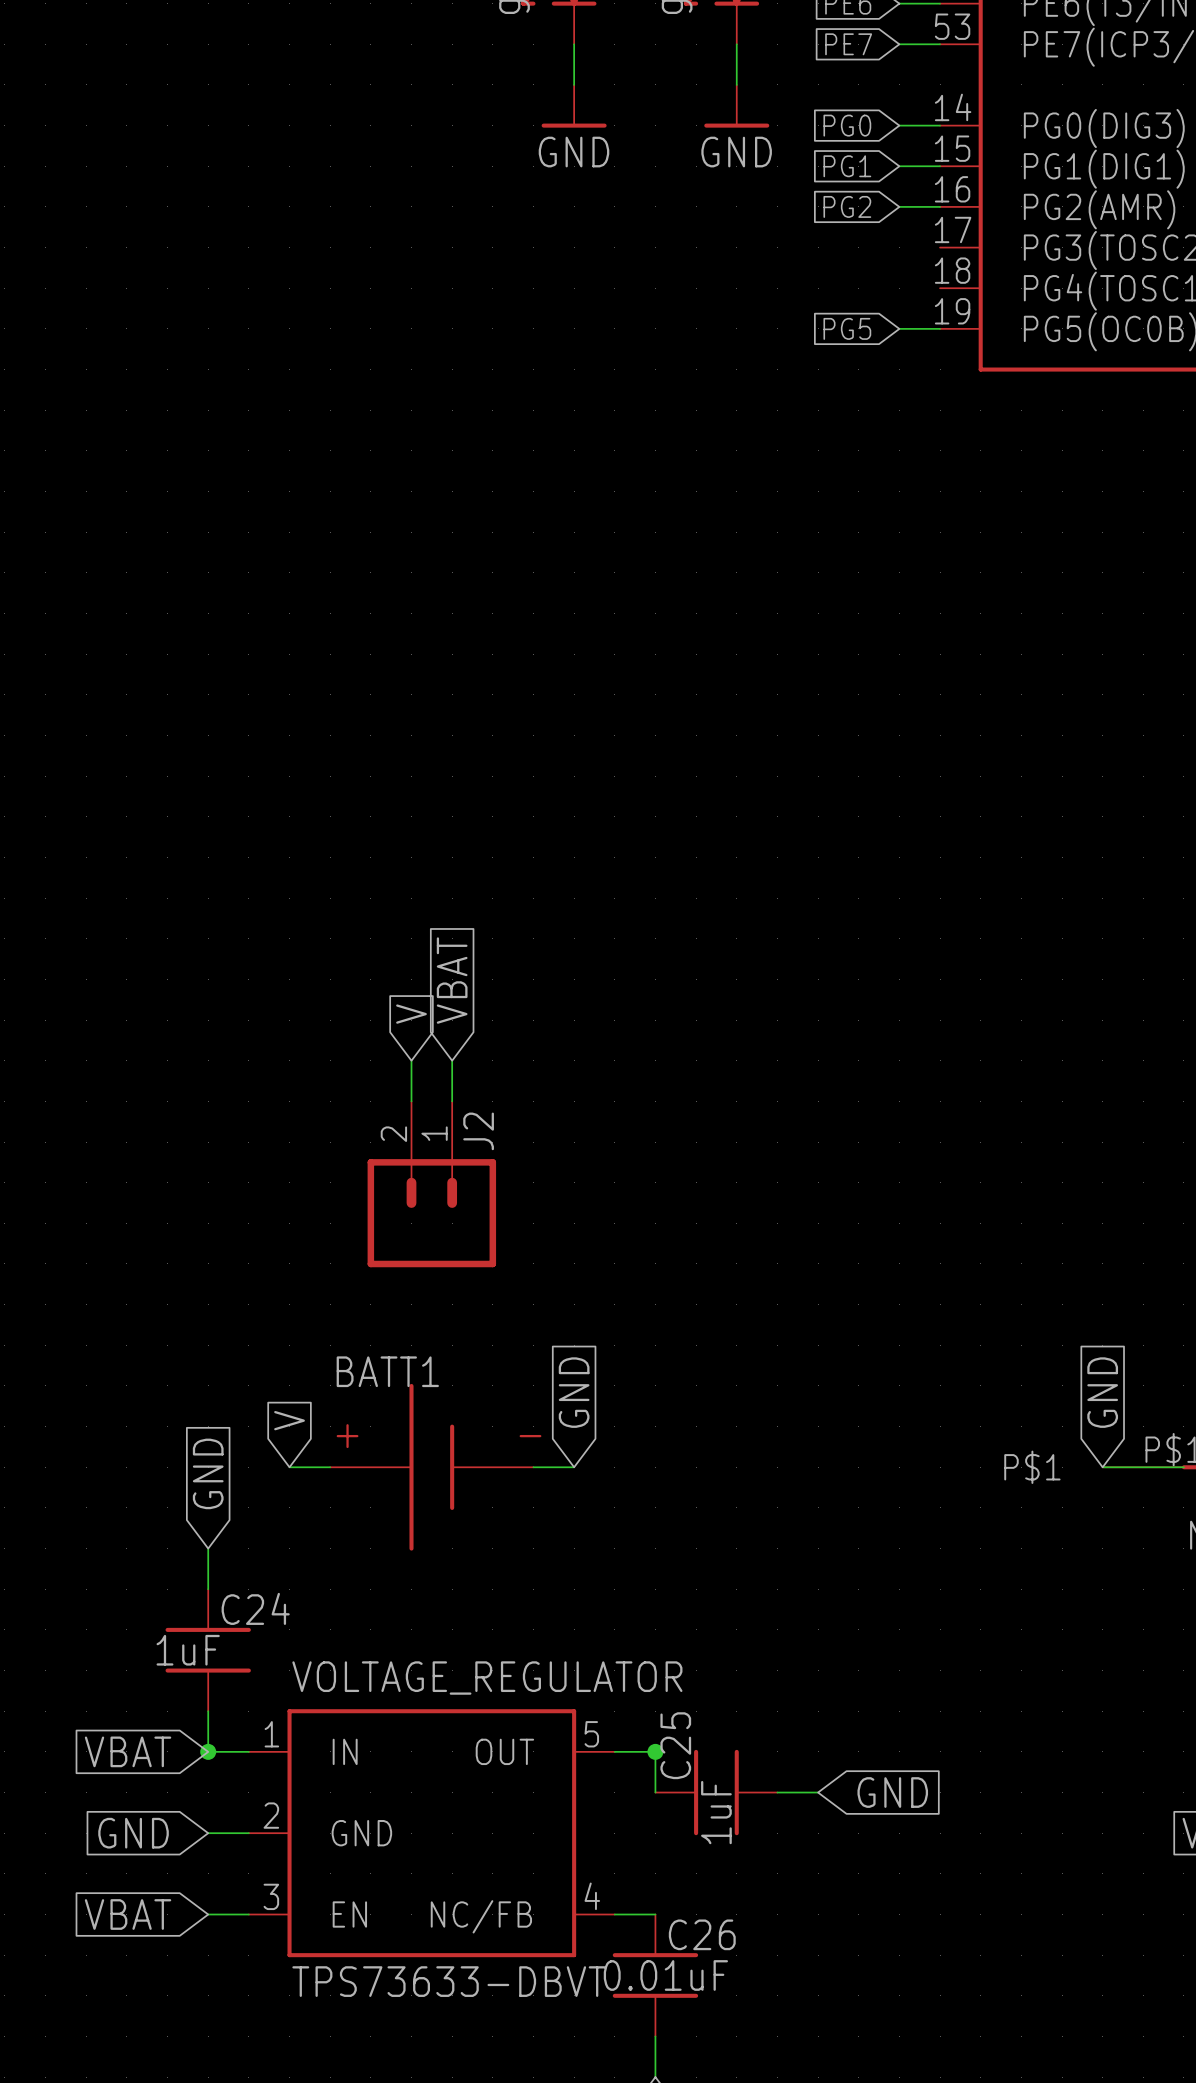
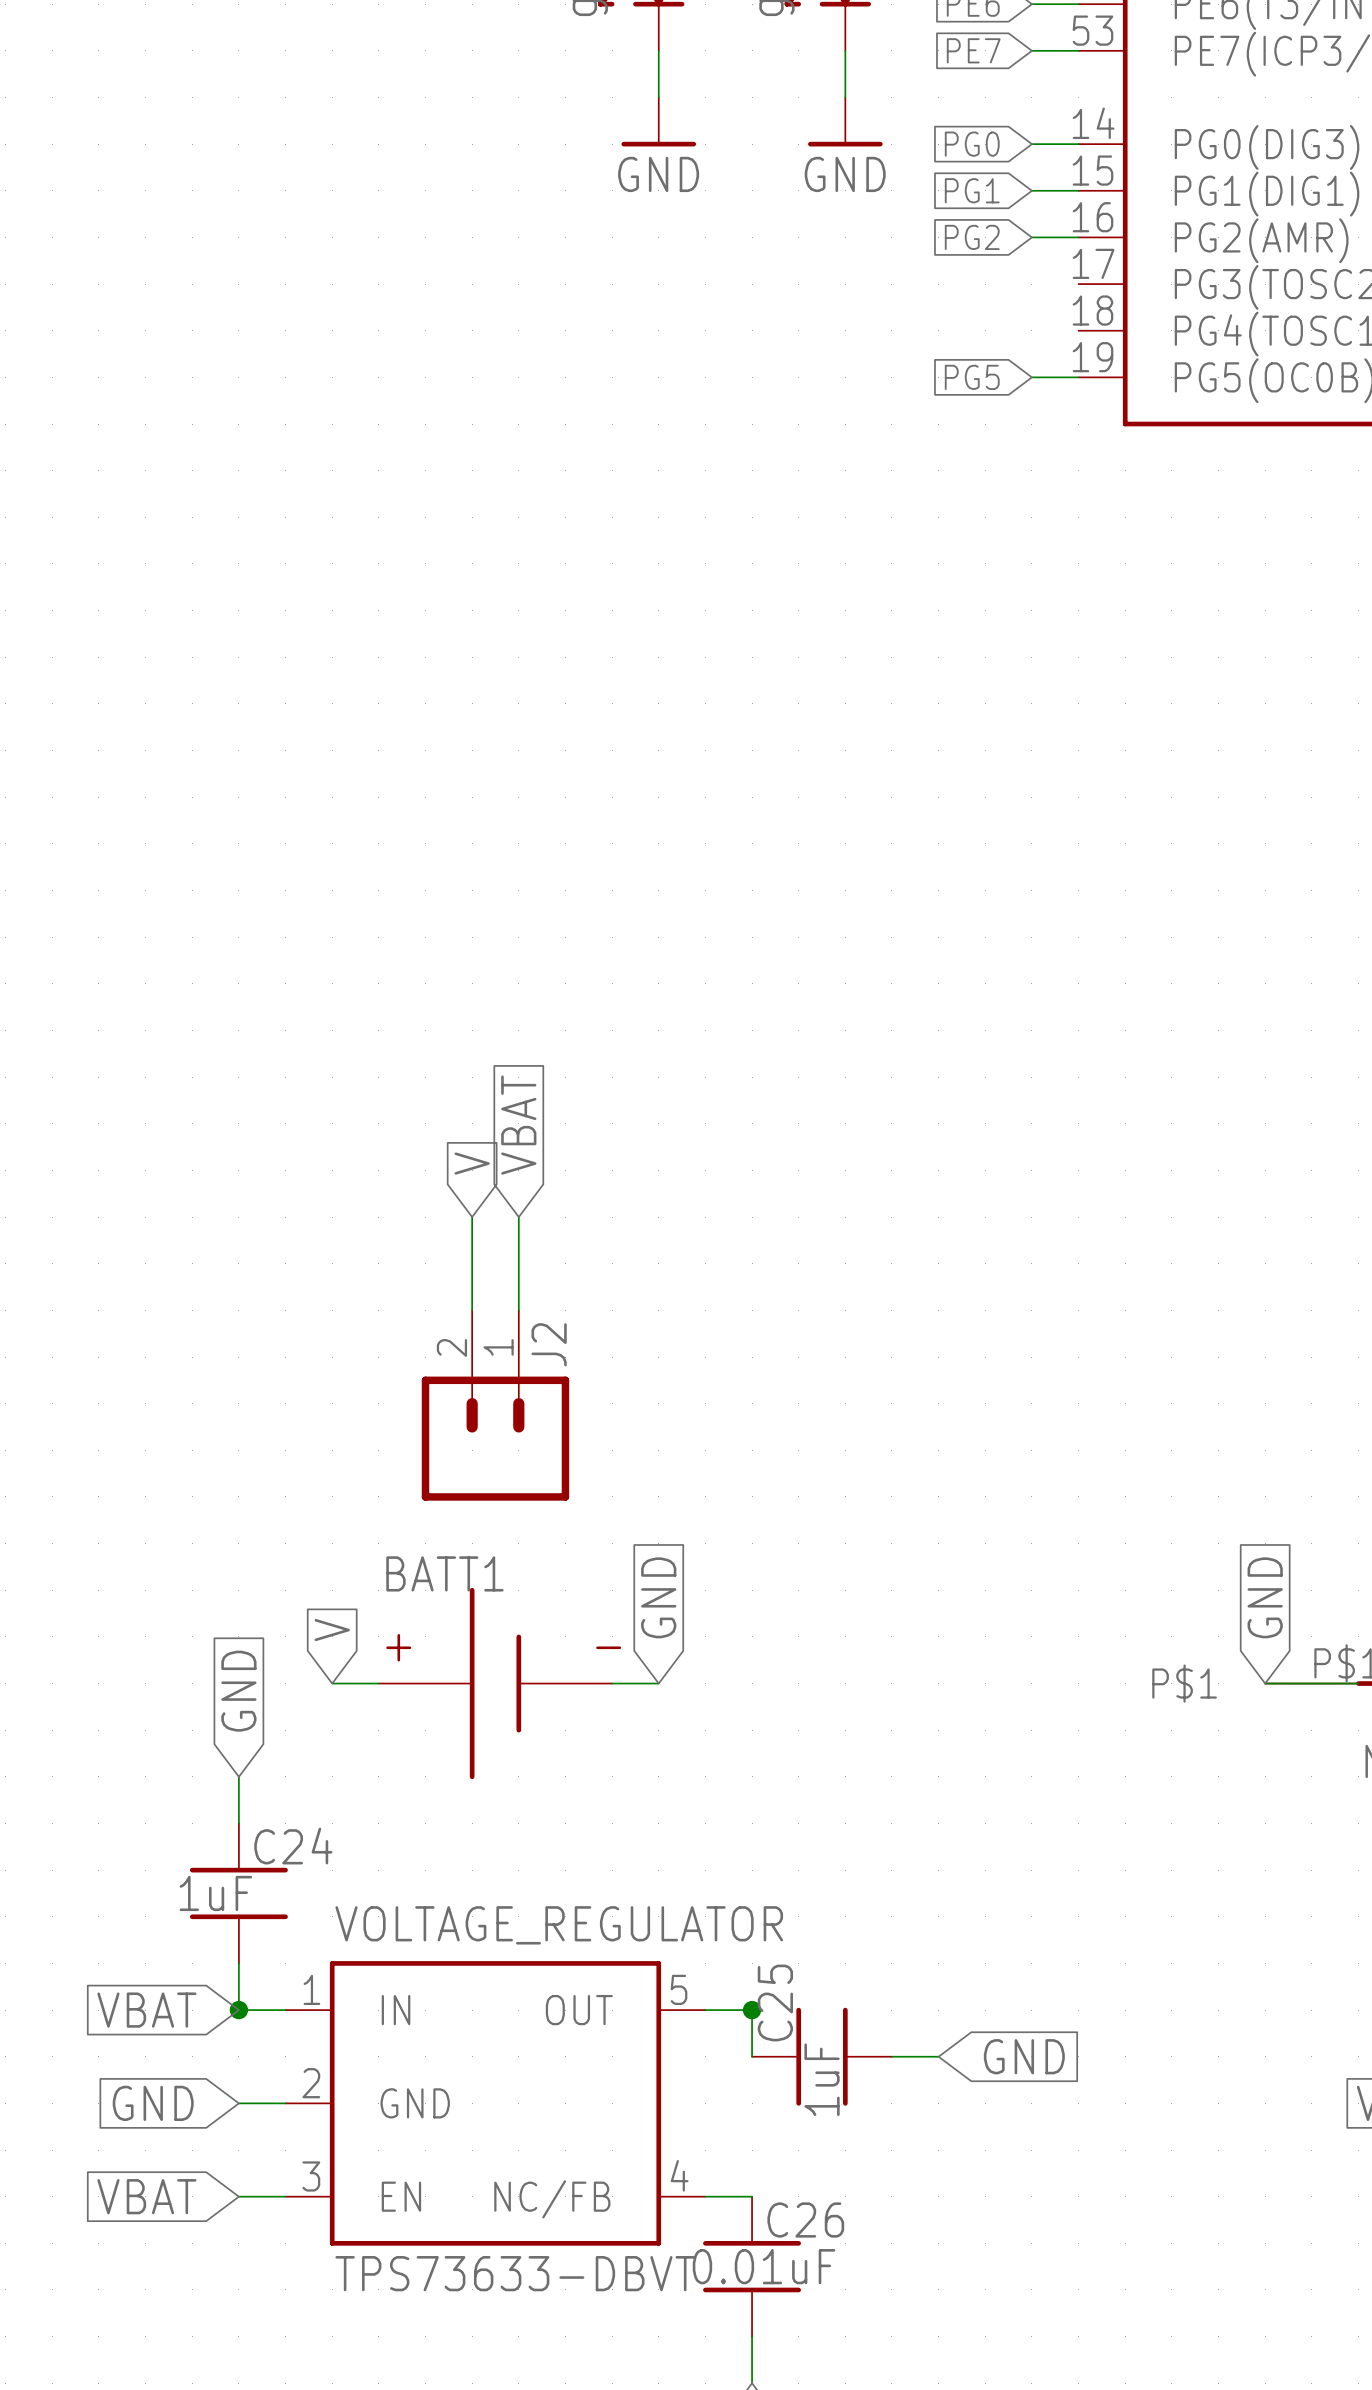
J2 position: (431, 1184) -> (495, 1405)

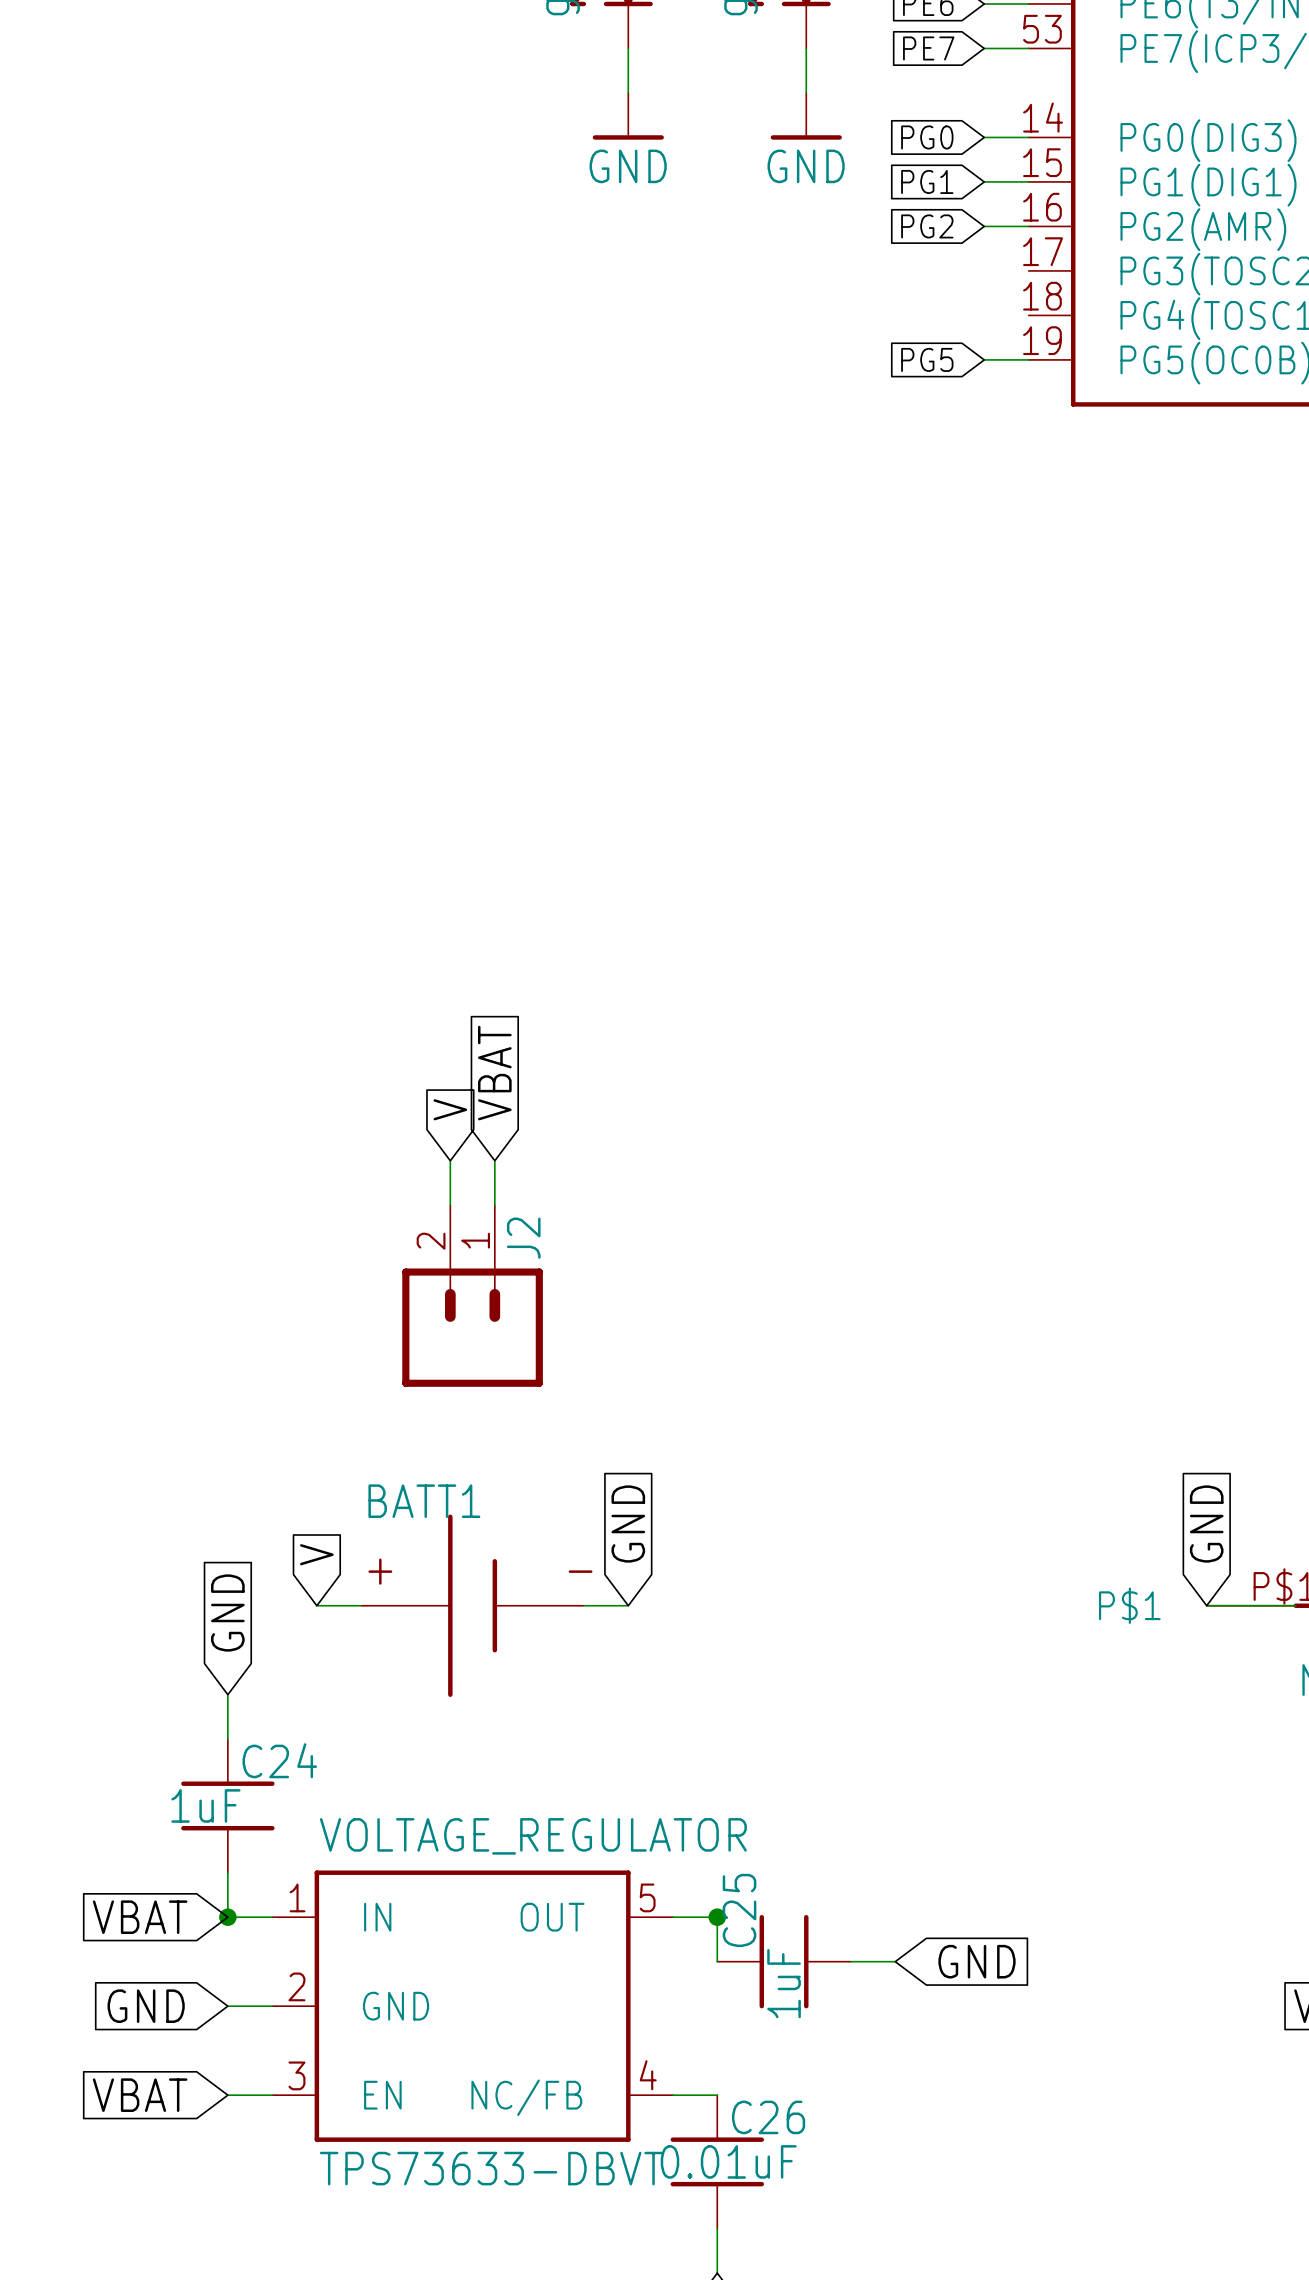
J2 position: (495, 1405) -> (472, 1296)

